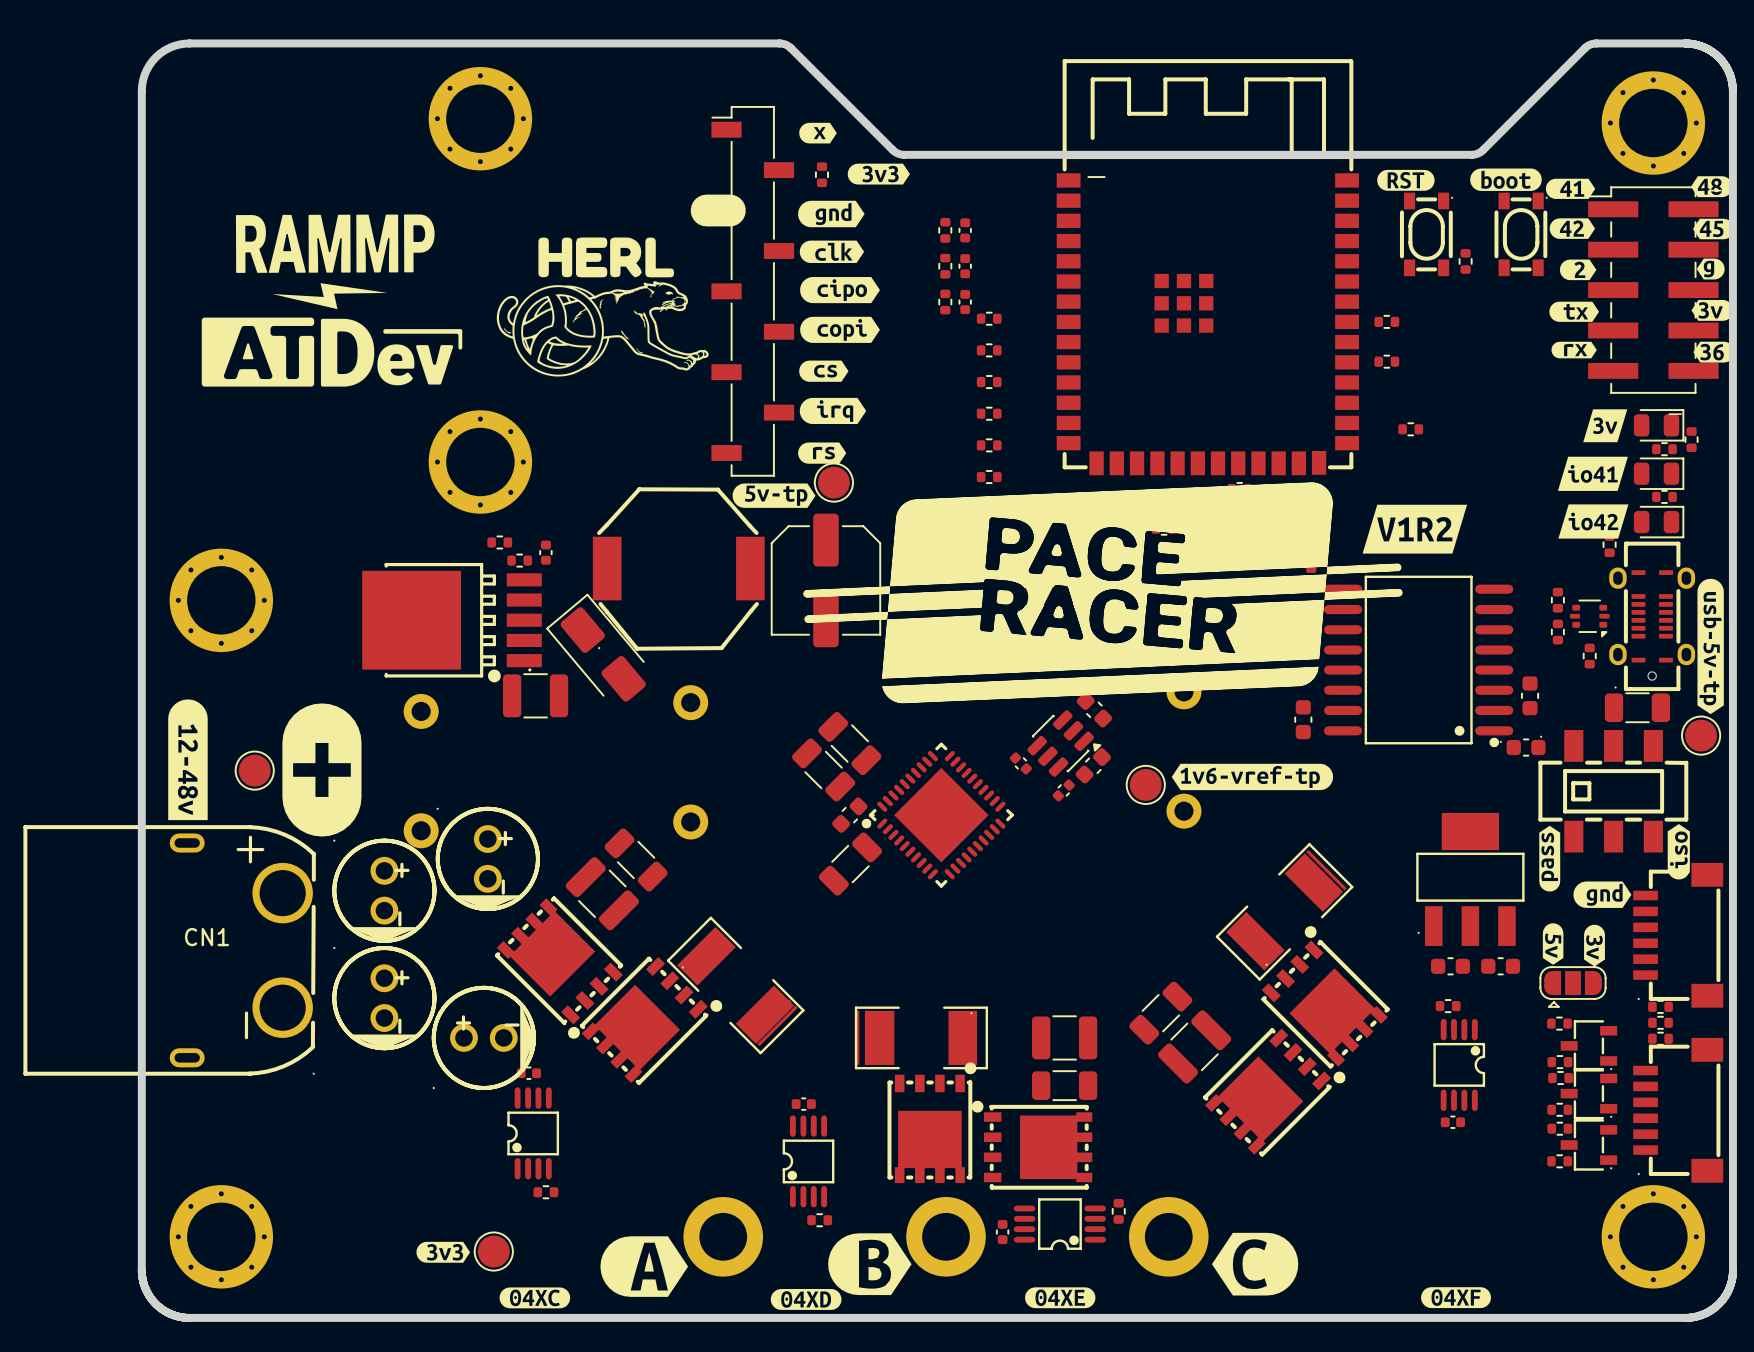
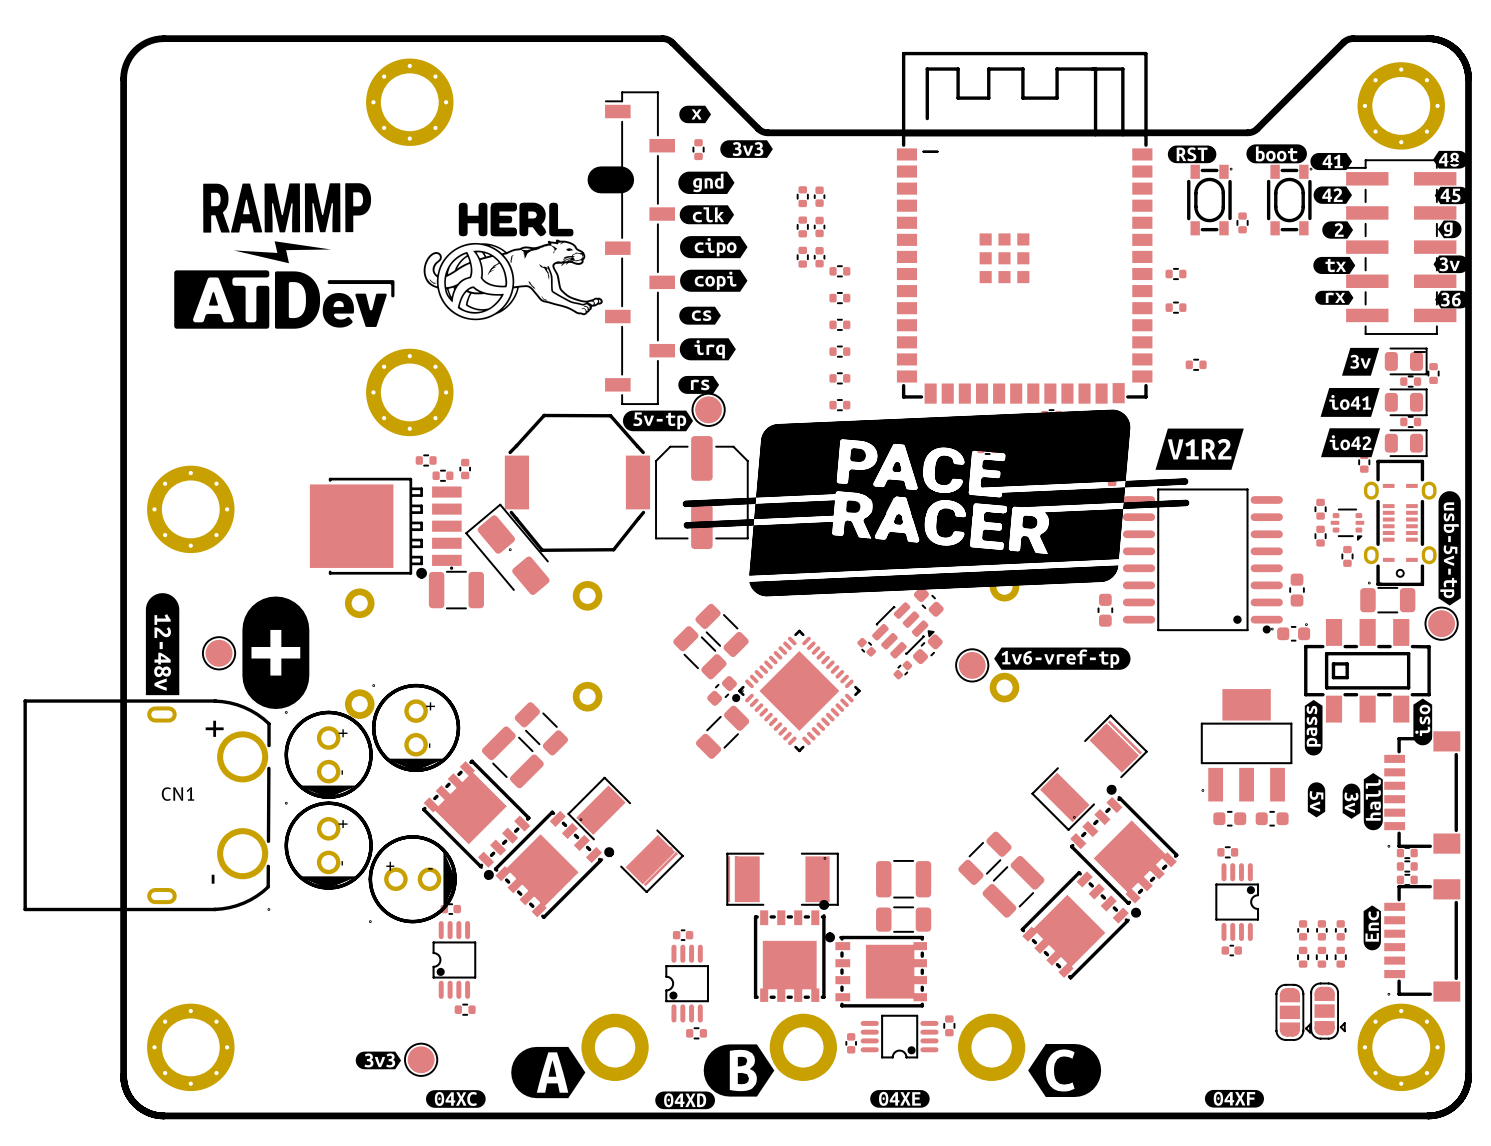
drawing: [1573, 881, 1632, 908] -> none
drawing: none -> [1363, 773, 1383, 831]
part: (1573, 987) -> none
part: (1559, 1023) -> none
part: (1588, 1045) -> none
part: (1559, 1062) -> none
part footprint: [1560, 1067, 1618, 1120] -> [1335, 920, 1347, 941]
drawing: none -> [1363, 905, 1381, 951]
part: (1560, 1078) -> none
part: none -> (1303, 930)
part: none -> (1321, 930)
part: (1559, 1109) -> none
part rotation: 0° (1559, 1128) -> 90° clockwise (1321, 957)
part: none -> (1303, 957)
part: none -> (1340, 957)
part: (1588, 1145) -> none
part: (1559, 1161) -> none
part: none -> (1327, 1011)
part: none -> (1293, 1012)

